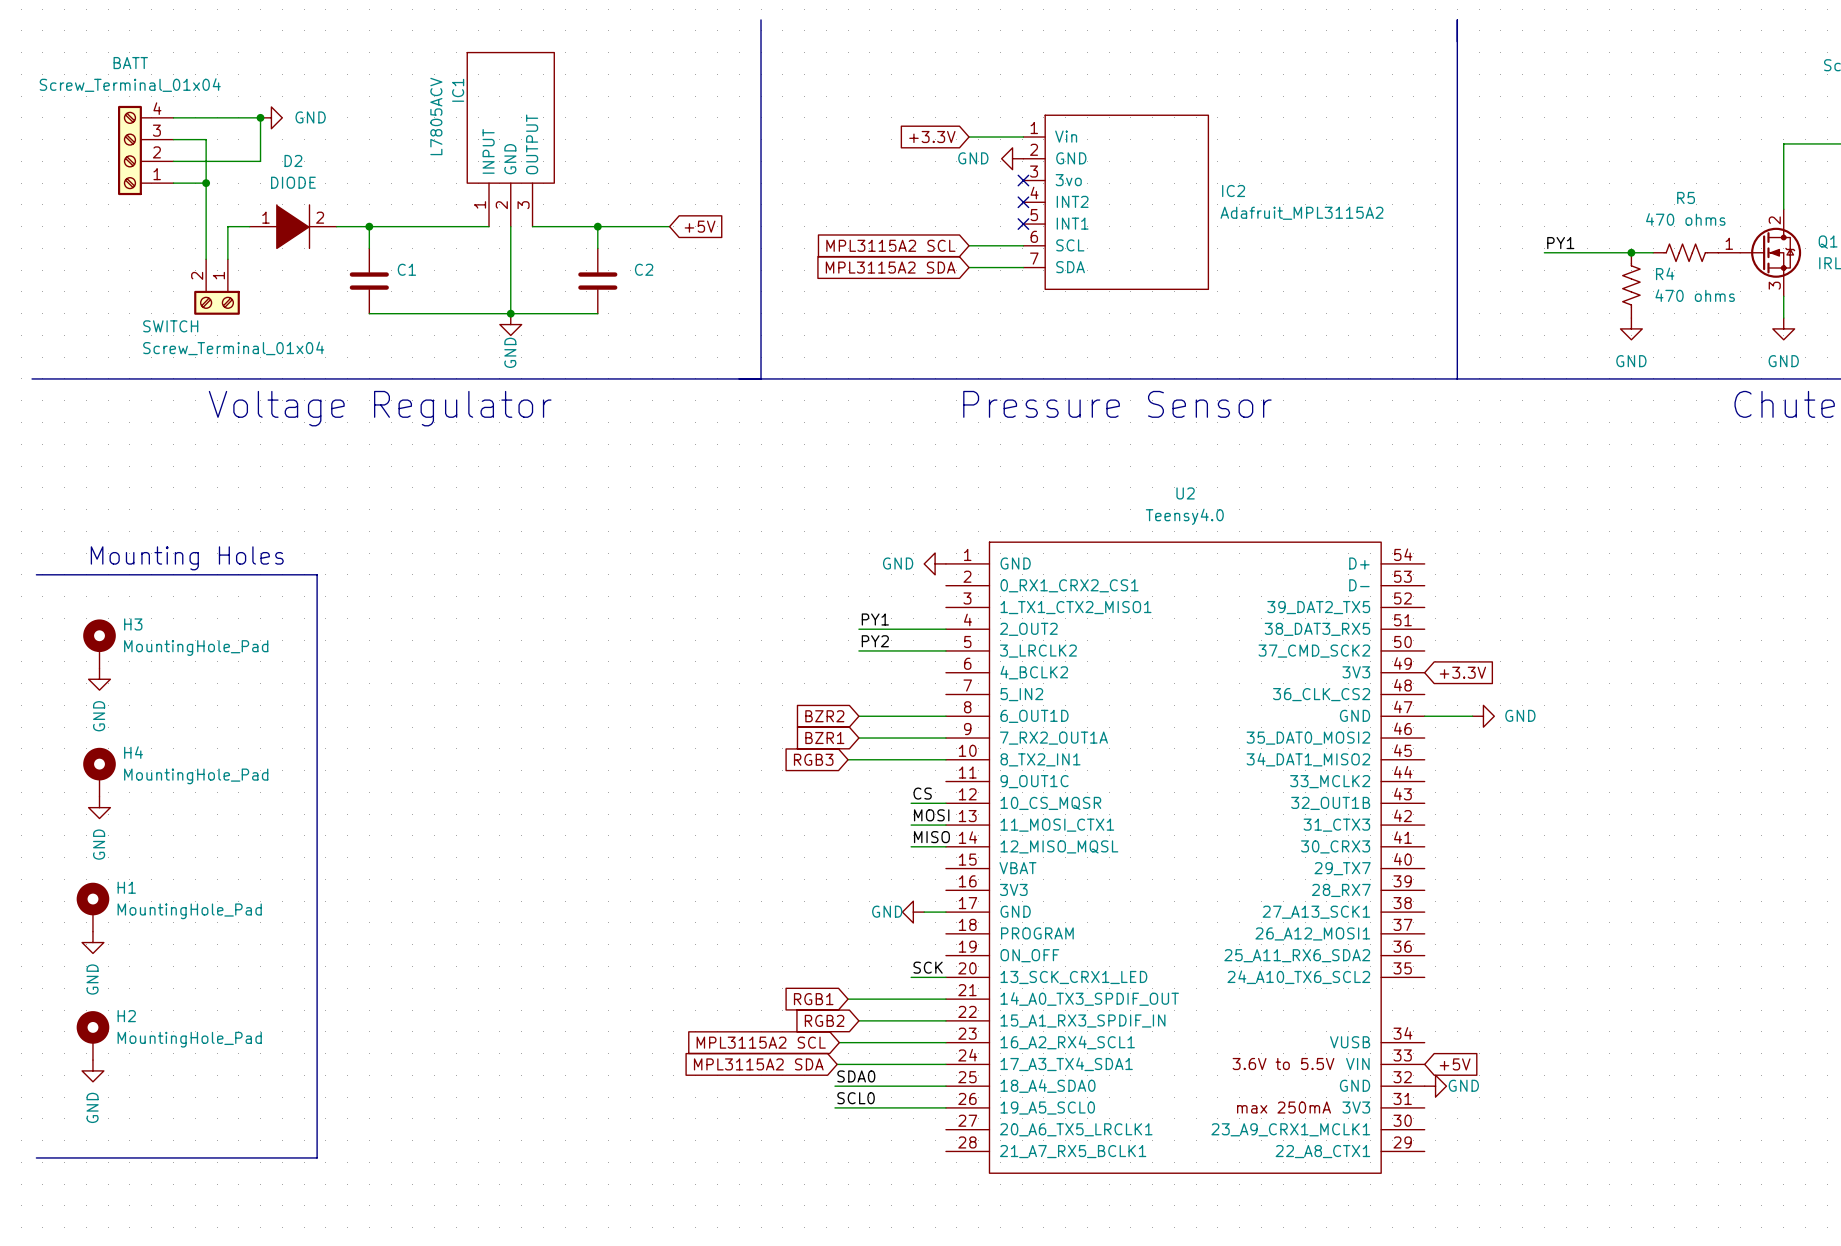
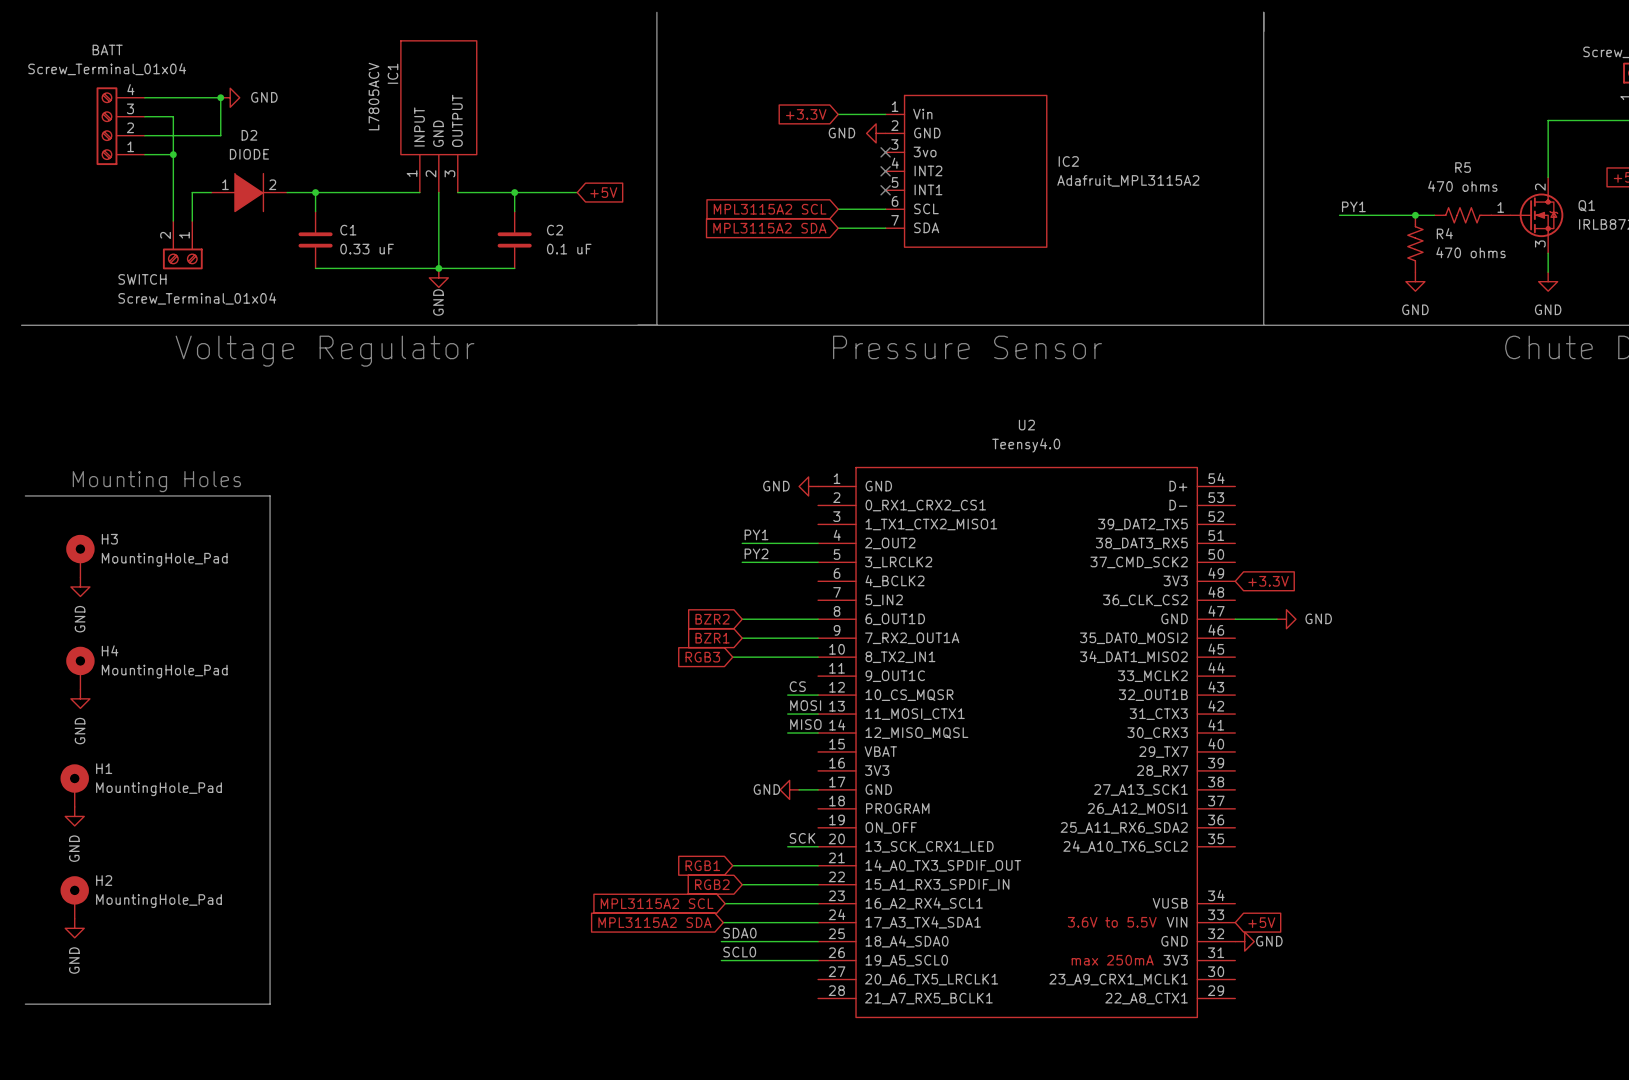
C1 value: none -> 0.33 uF (367, 249)
C2 value: none -> 0.1 uF (569, 249)

